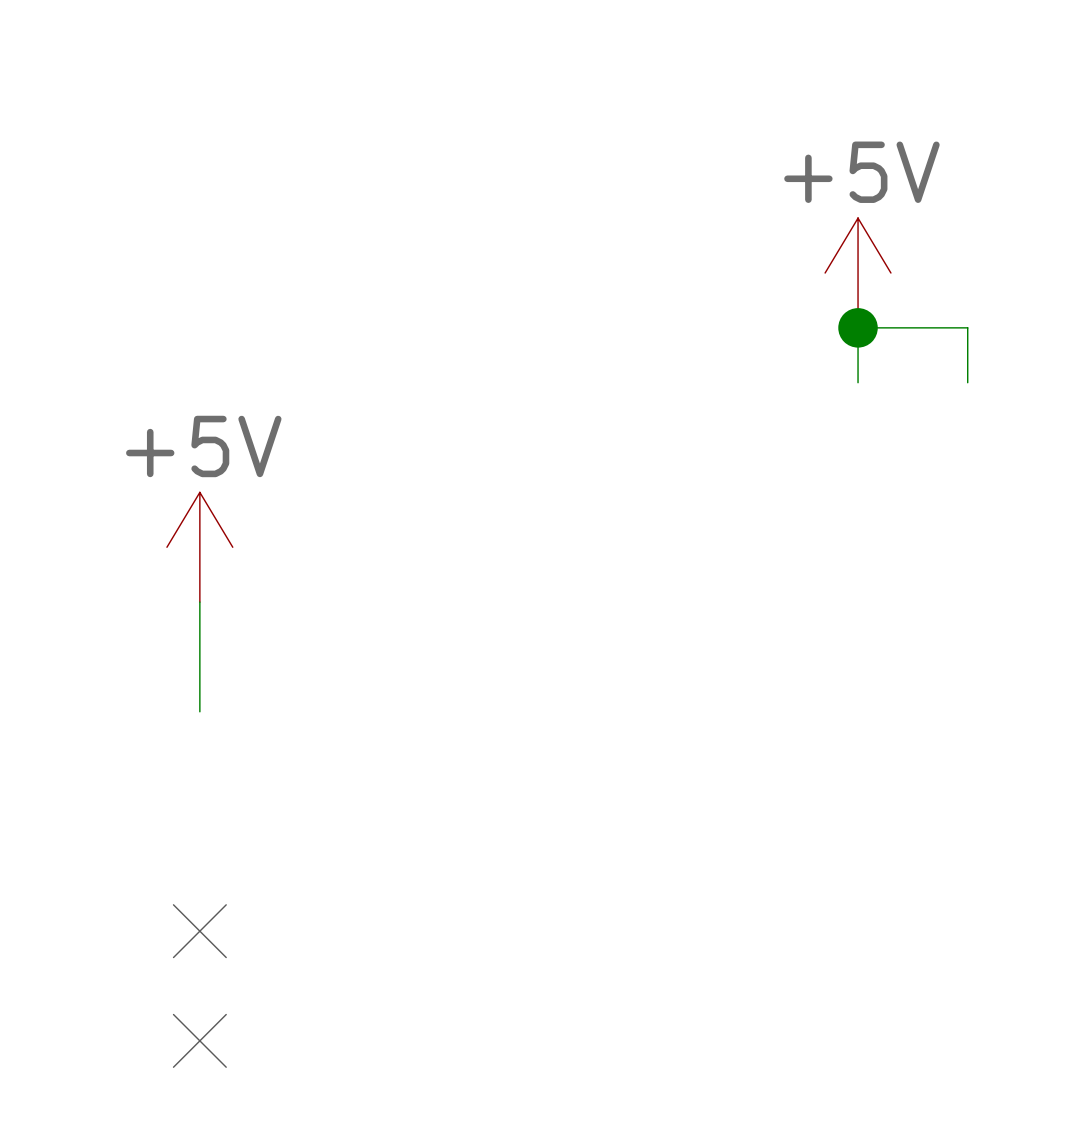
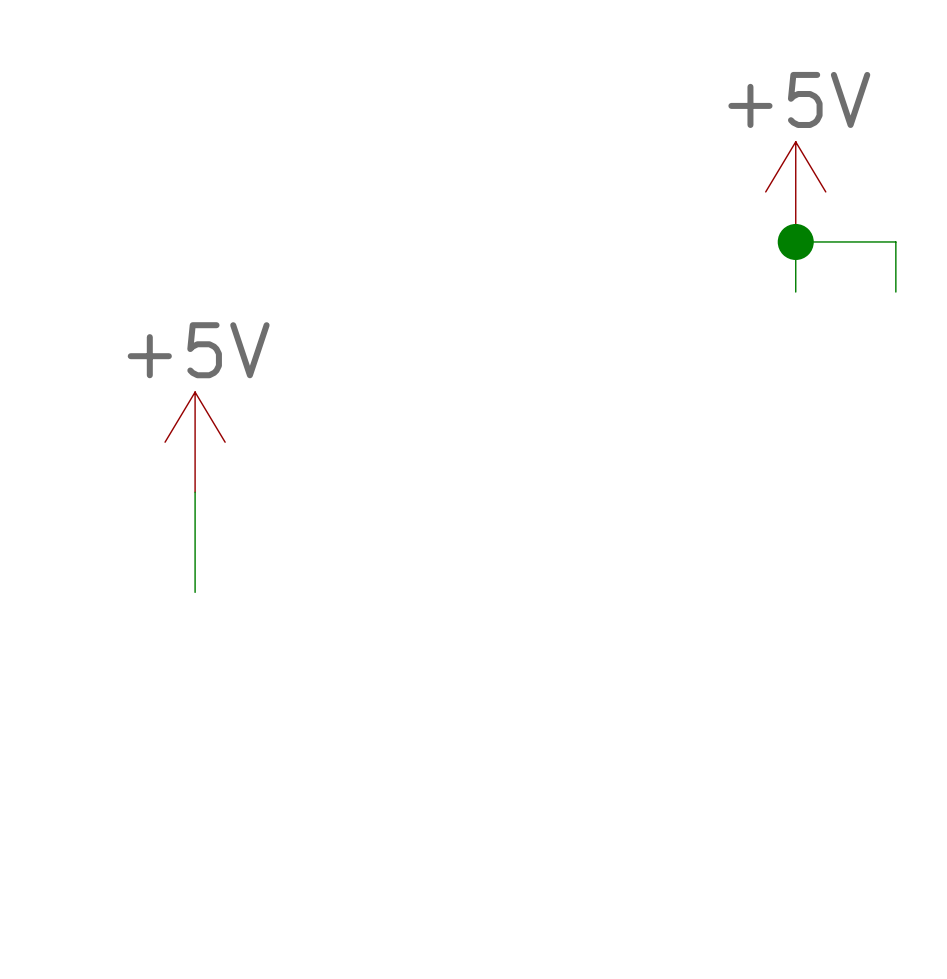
no-connect mark: (199, 931) -> none
no-connect mark: (199, 1040) -> none

